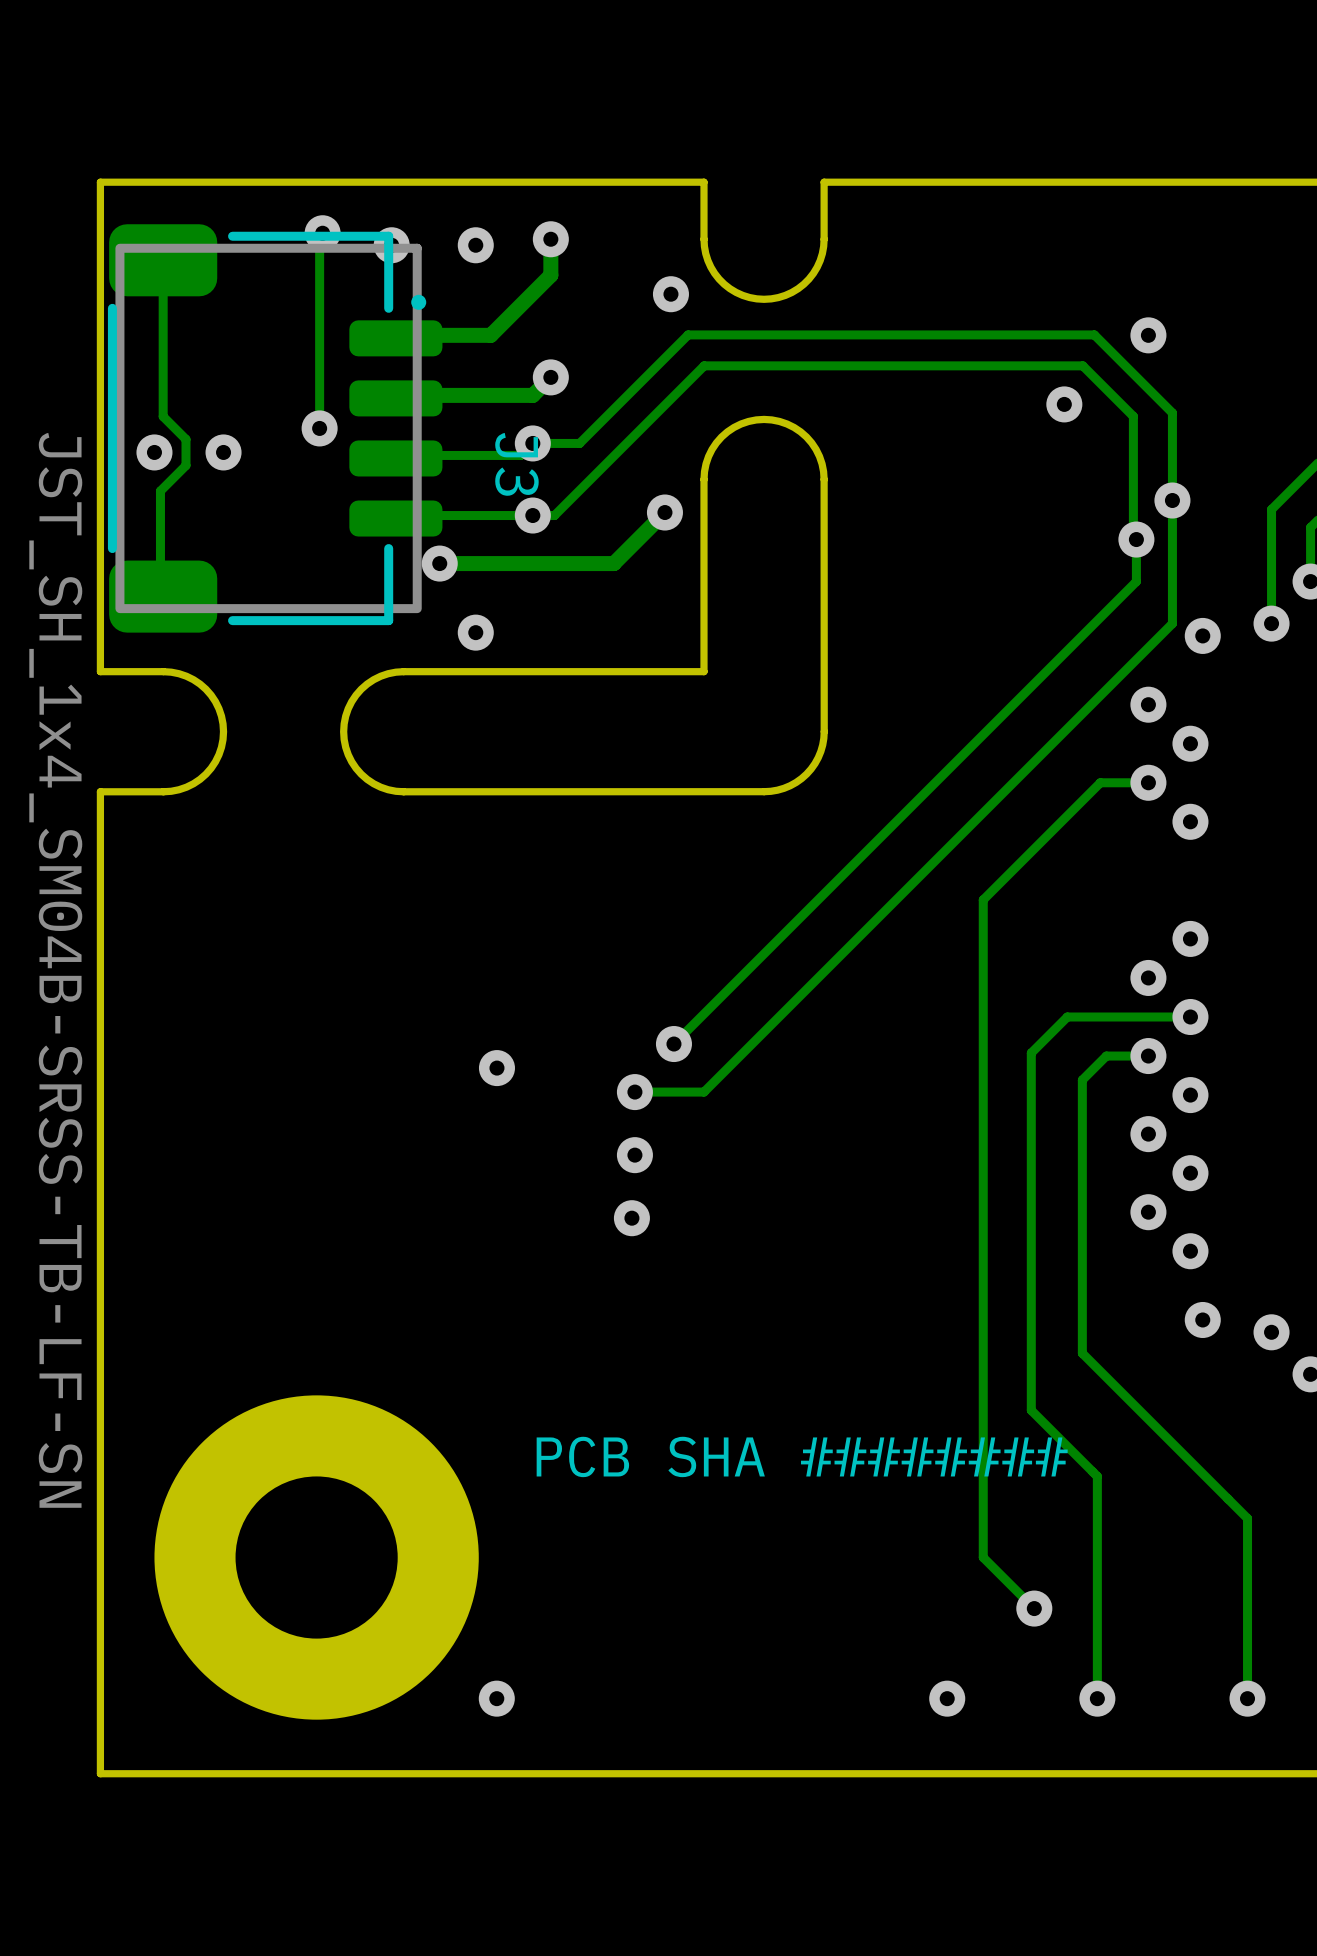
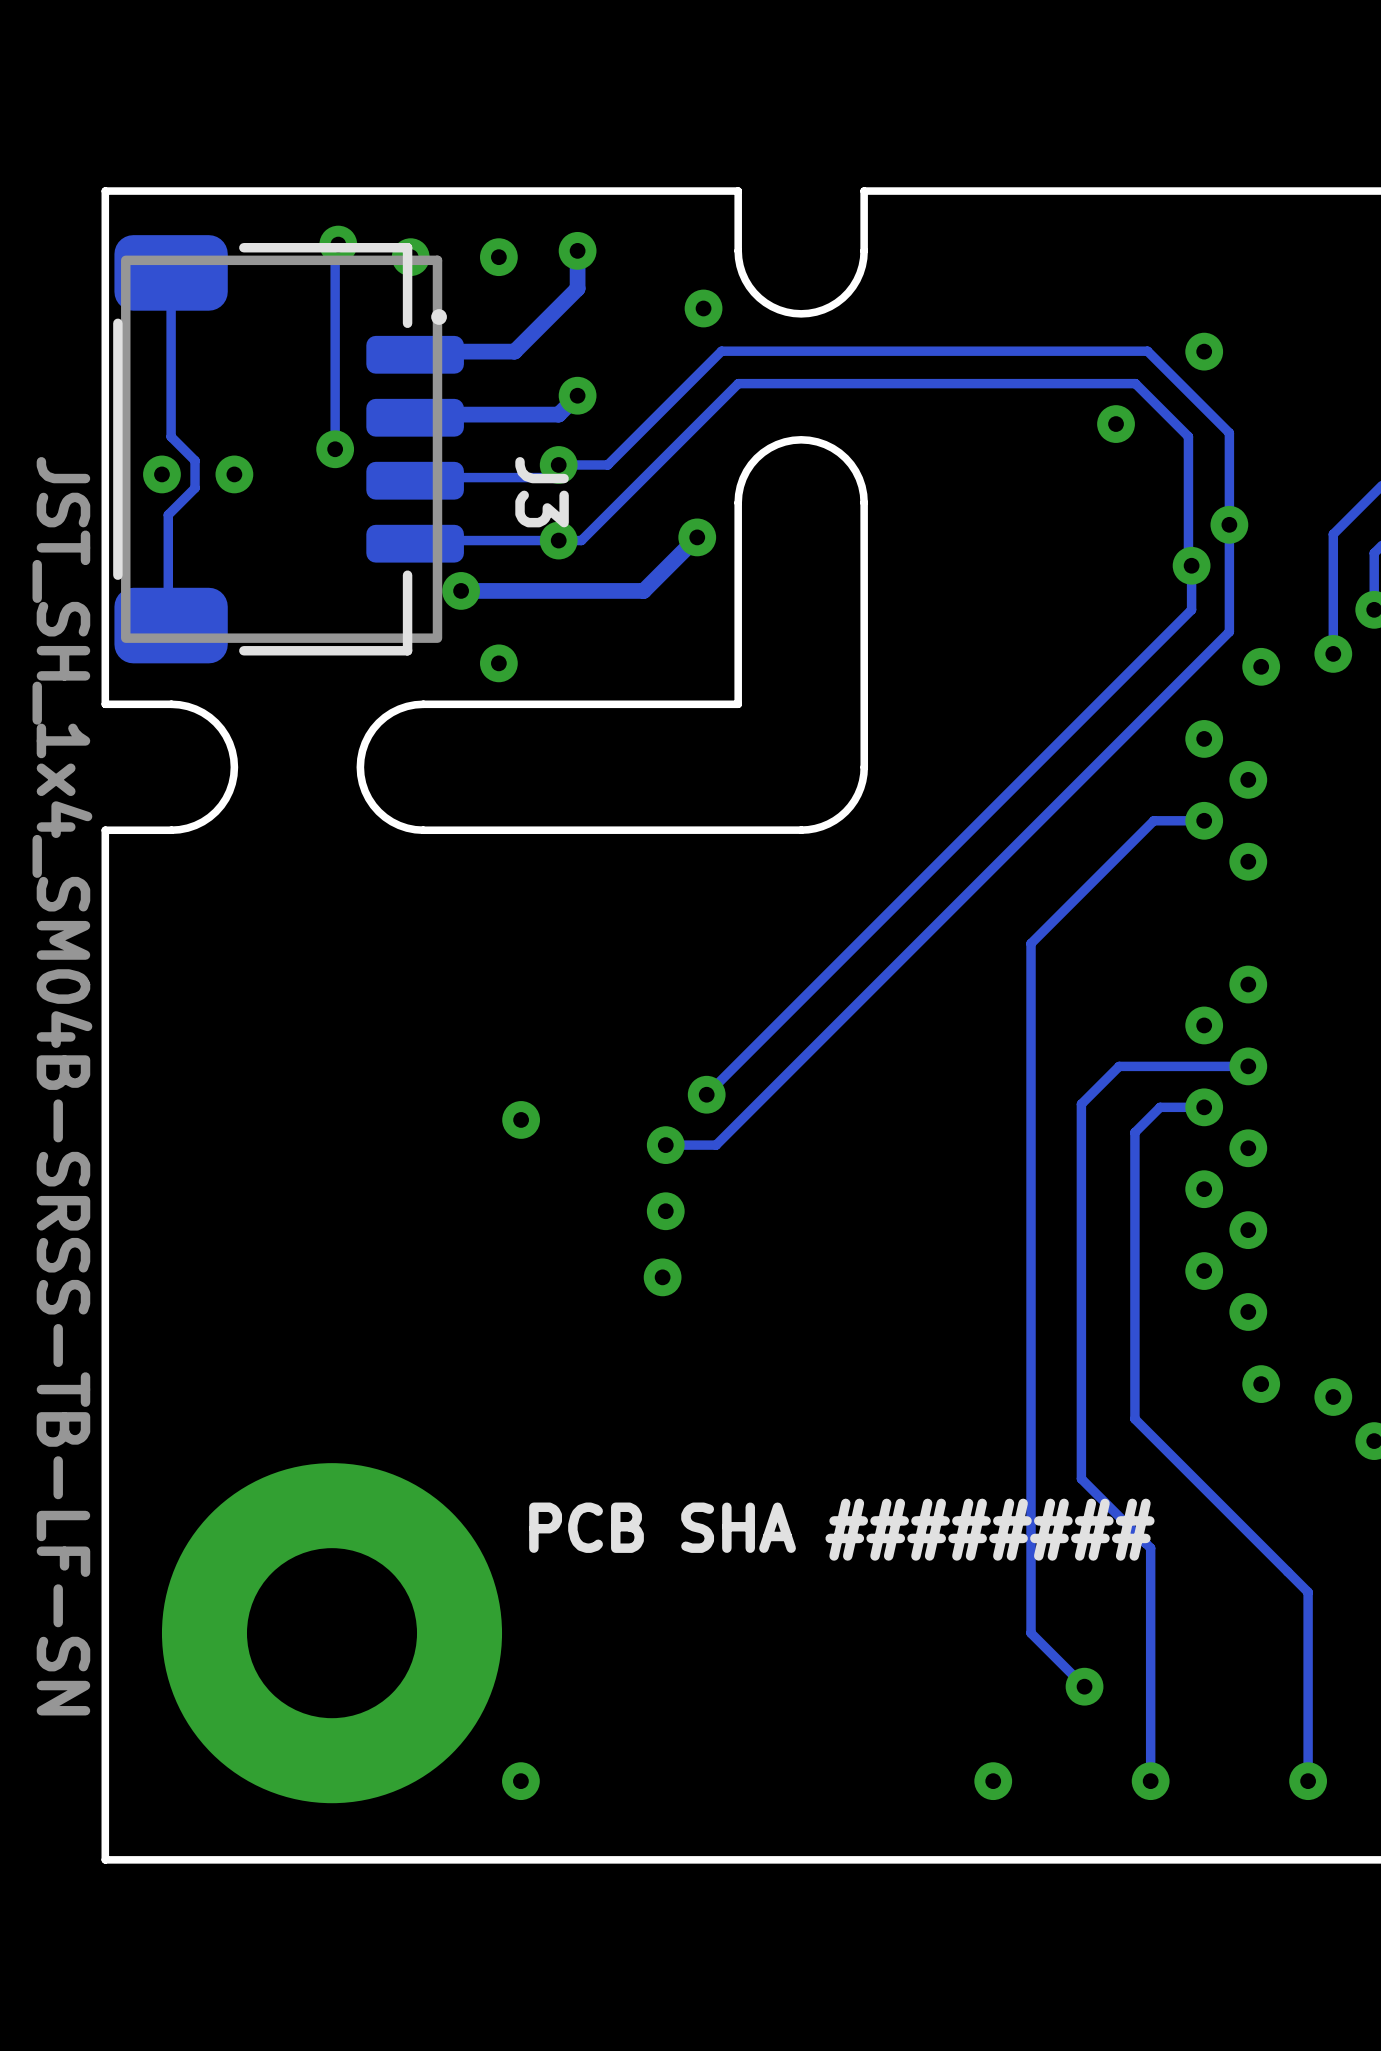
track: (1172, 602) (1172, 623) (703, 1092) (682, 1092) -> (1229, 631) (716, 1145)

